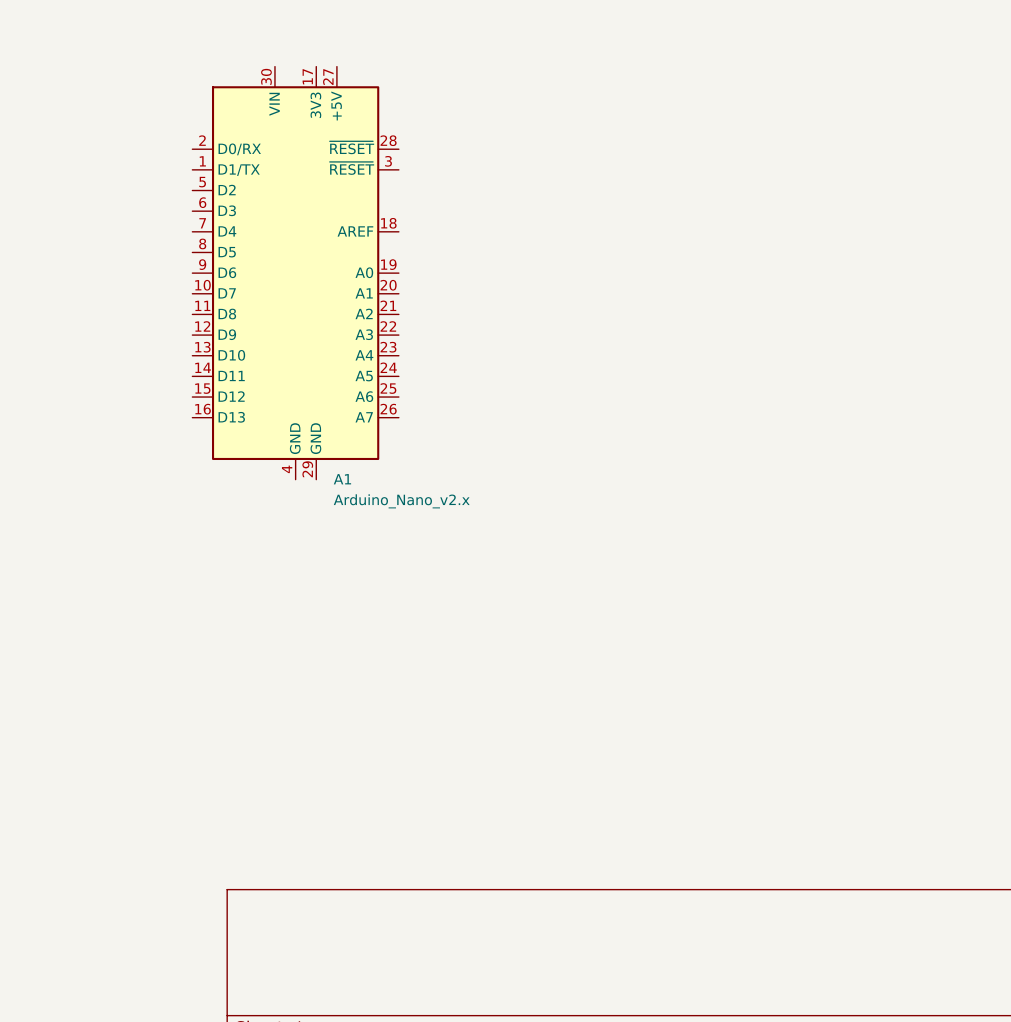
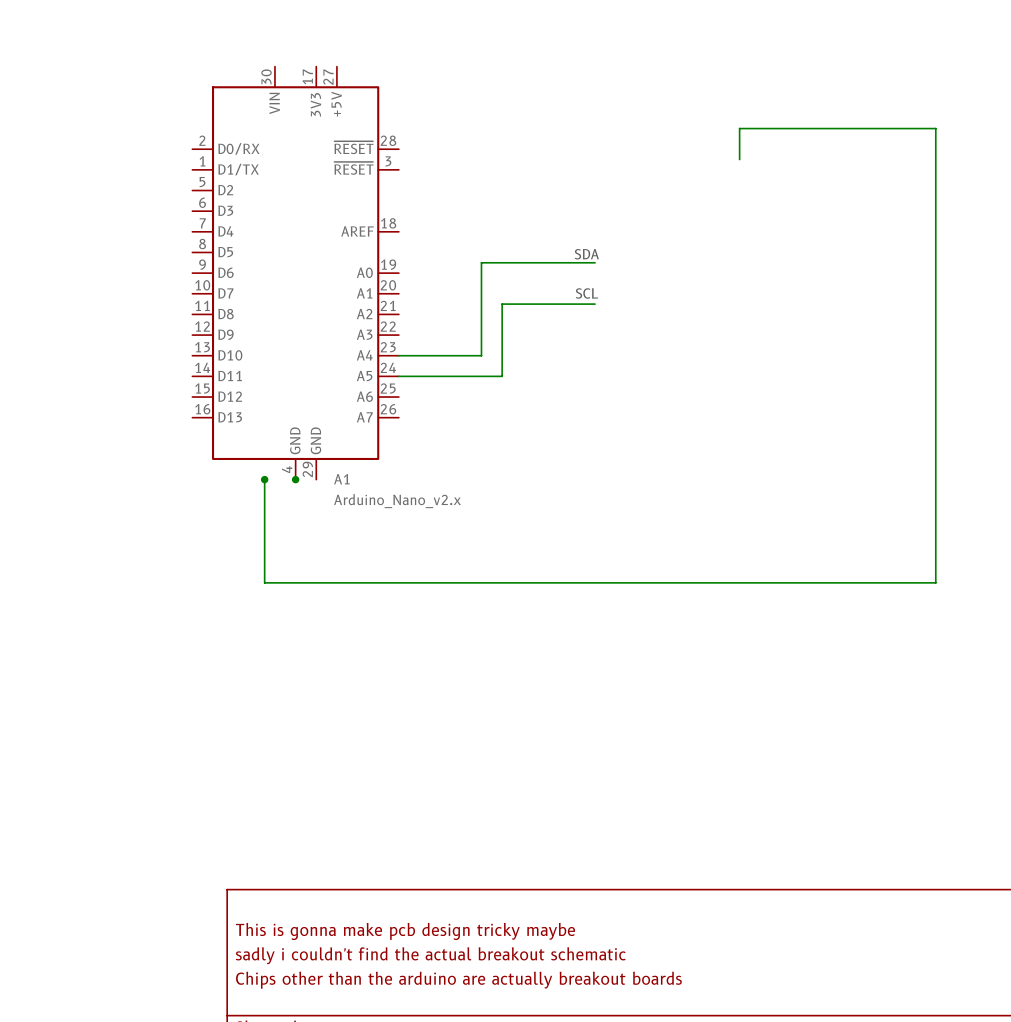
wire: none -> (739, 159) (739, 128) (935, 128) (935, 582) (264, 582) (264, 479)
text: none -> SDA (586, 254)
wire: none -> (595, 262) (481, 262) (481, 355) (398, 355)
text: none -> SCL (586, 293)
wire: none -> (595, 304) (502, 304) (502, 376) (398, 376)
junction: none -> (264, 479)
junction: none -> (295, 479)
title block: none -> This is gonna make pcb design tricky maybe (405, 931)
title block: none -> sadly i couldn't find the actual breakout schematic (430, 955)
title block: none -> Chips other than the arduino are actually breakout boards (458, 980)

